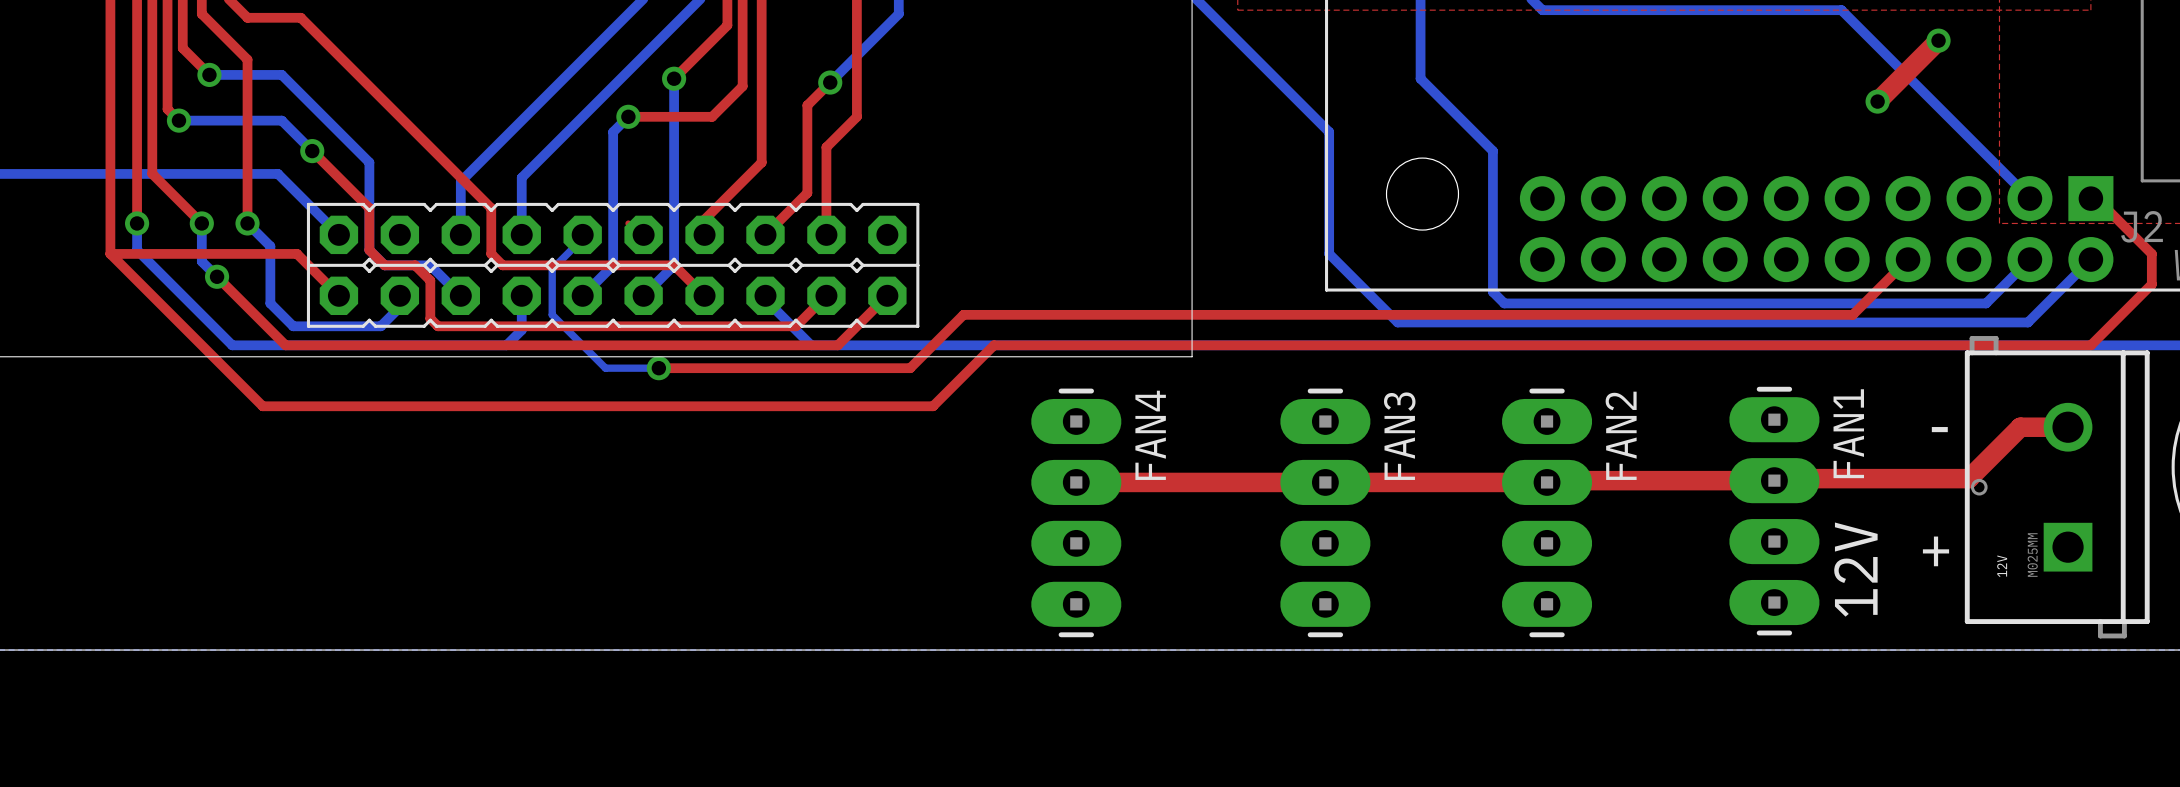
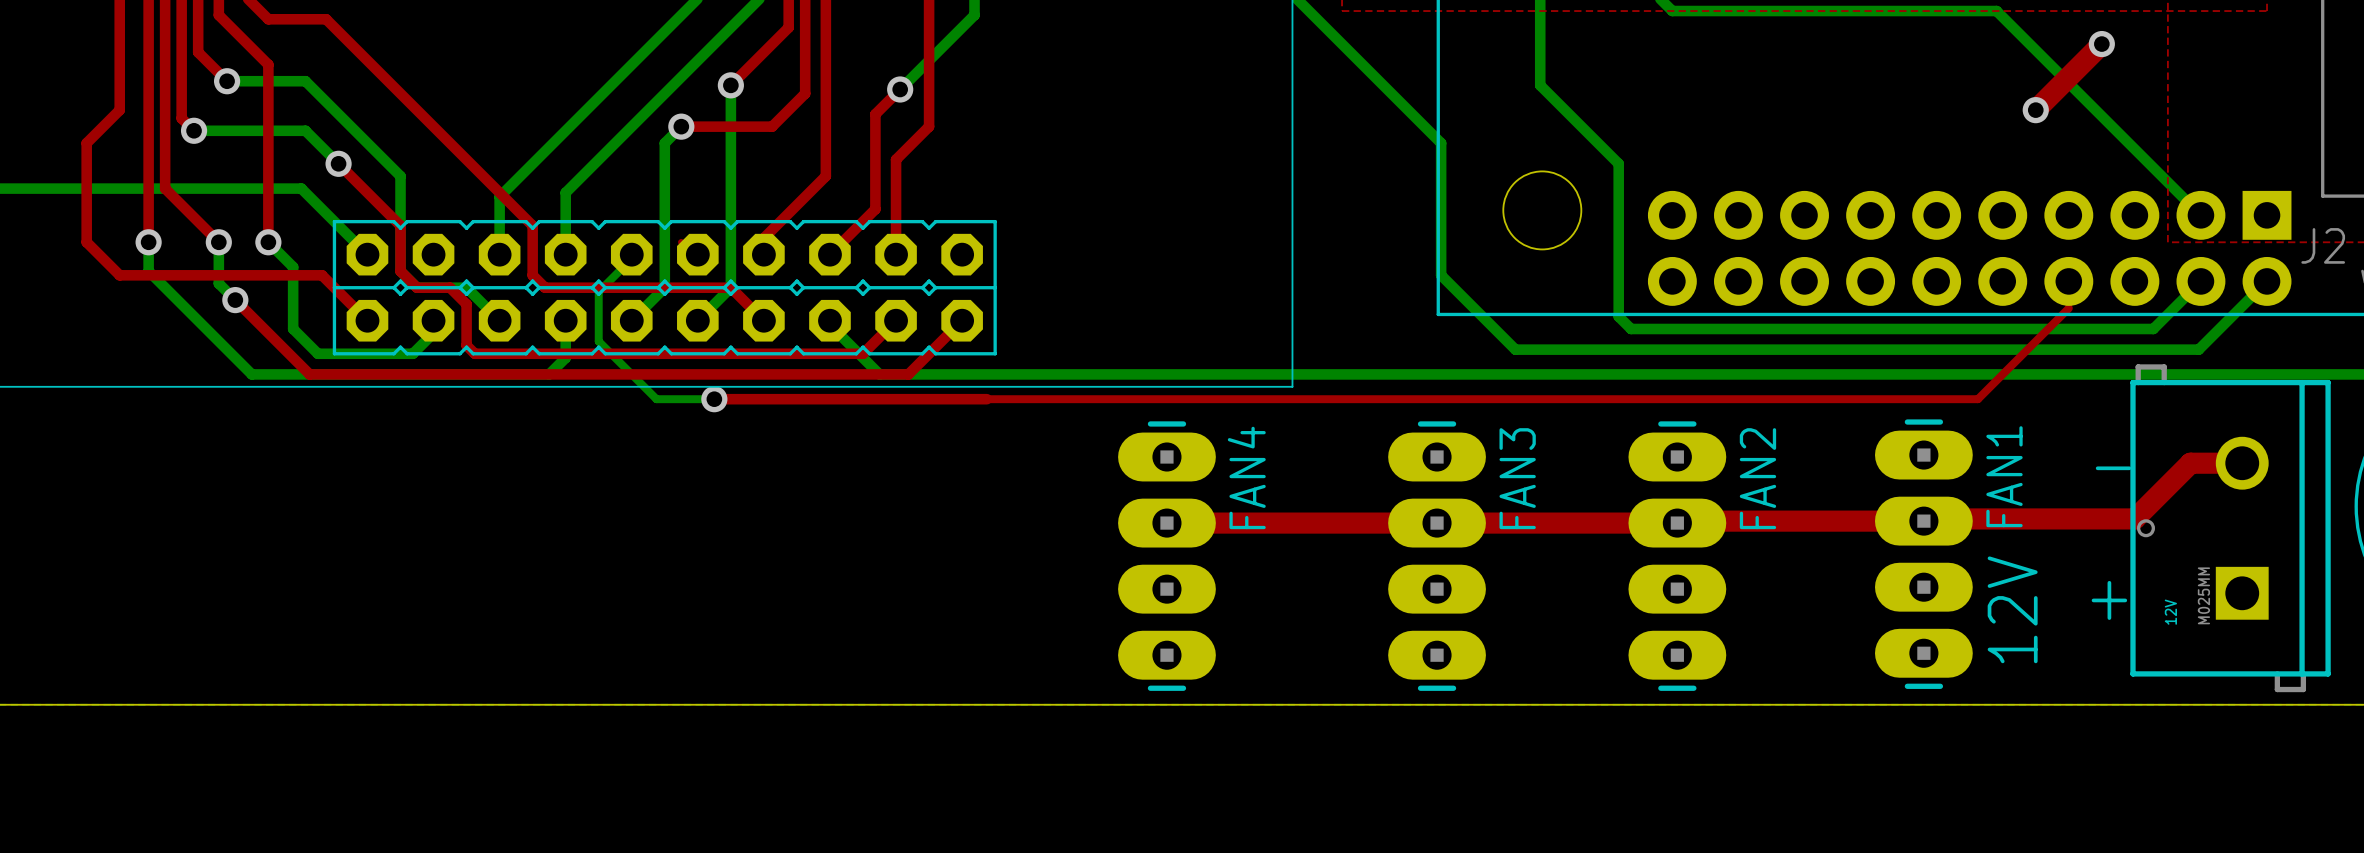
top track: (110, 101) (110, 253) (262, 406) (933, 406) (994, 345) (2090, 345) (2151, 284) (2151, 253) (2096, 198) (2090, 198) -> (119, 110) (86, 143) (86, 242) (119, 275)
top track: (1908, 259) (1852, 314) (963, 314) (910, 368) -> (2068, 275) (2068, 308) (1977, 399) (986, 399)

